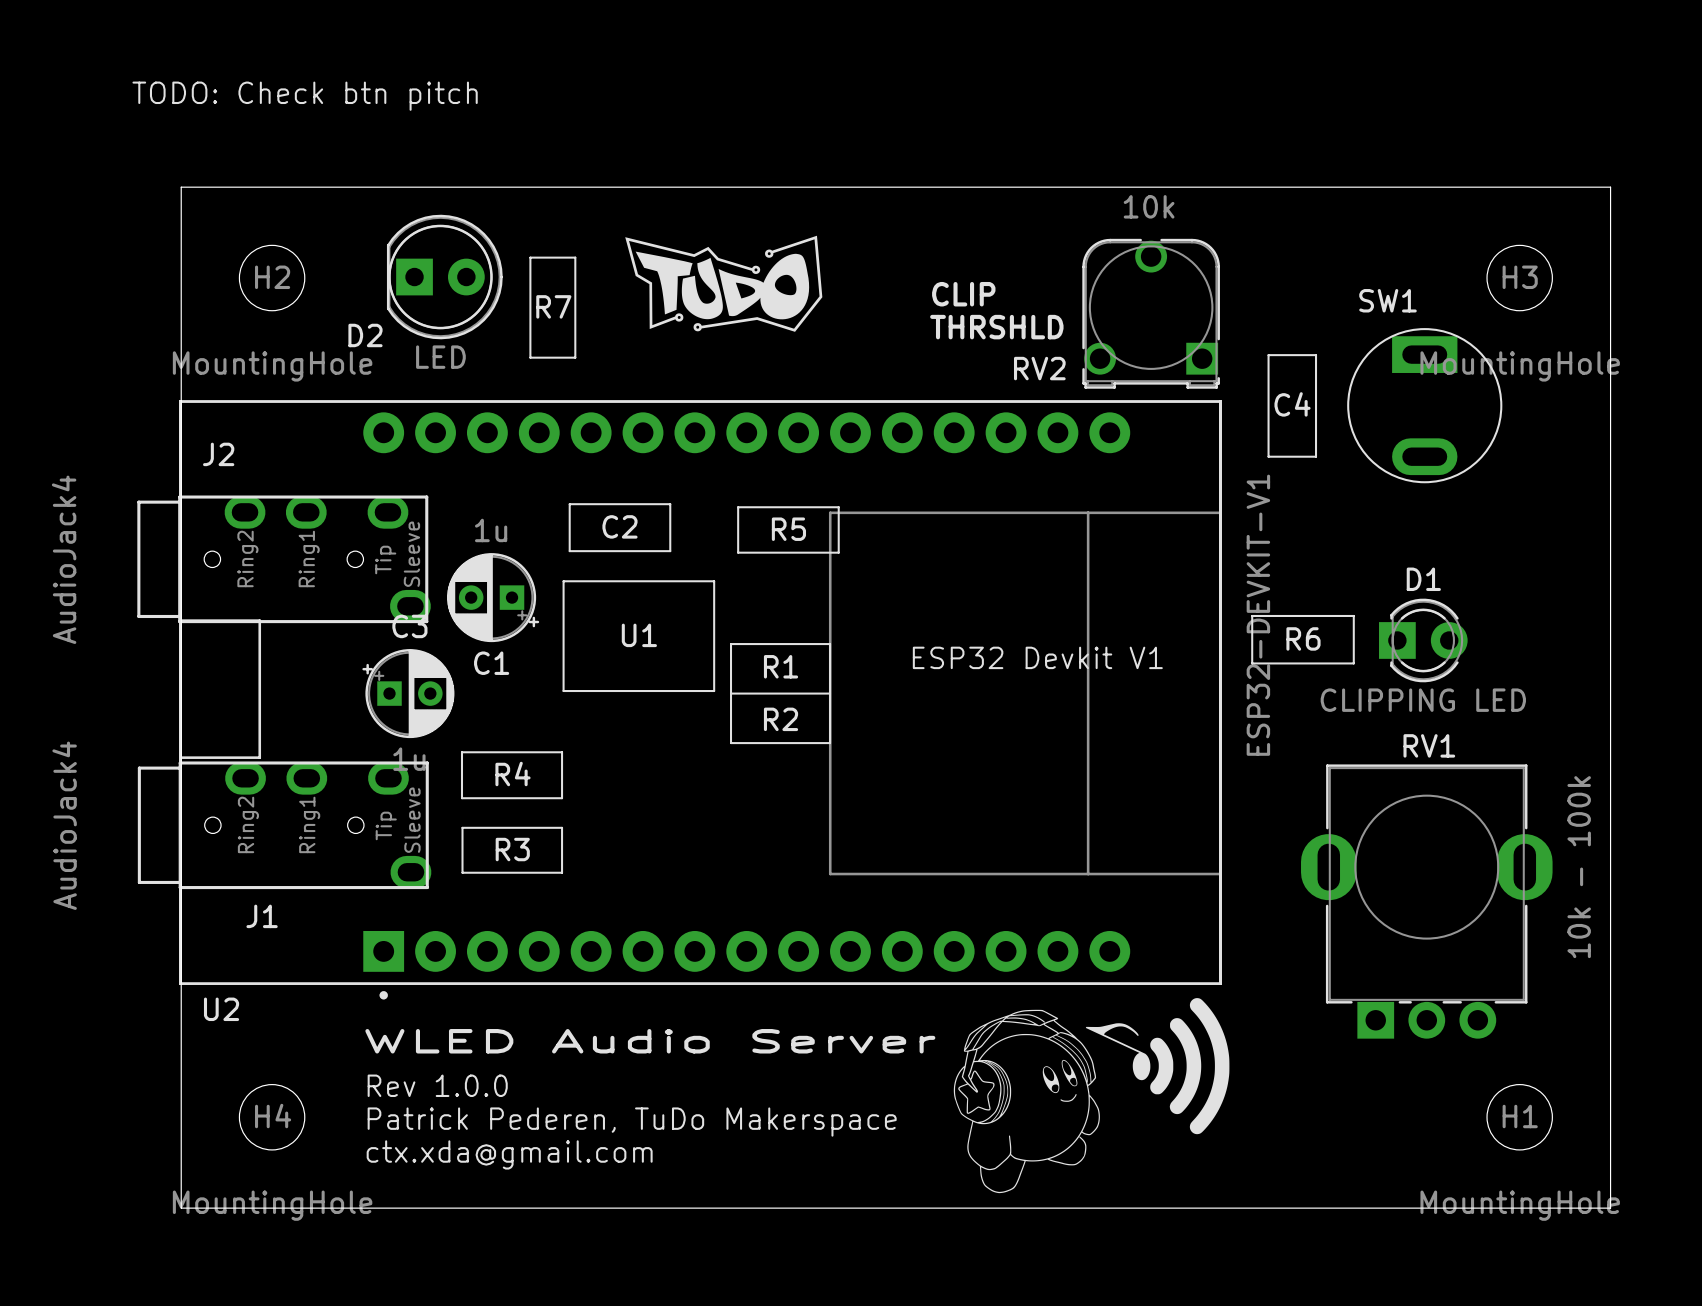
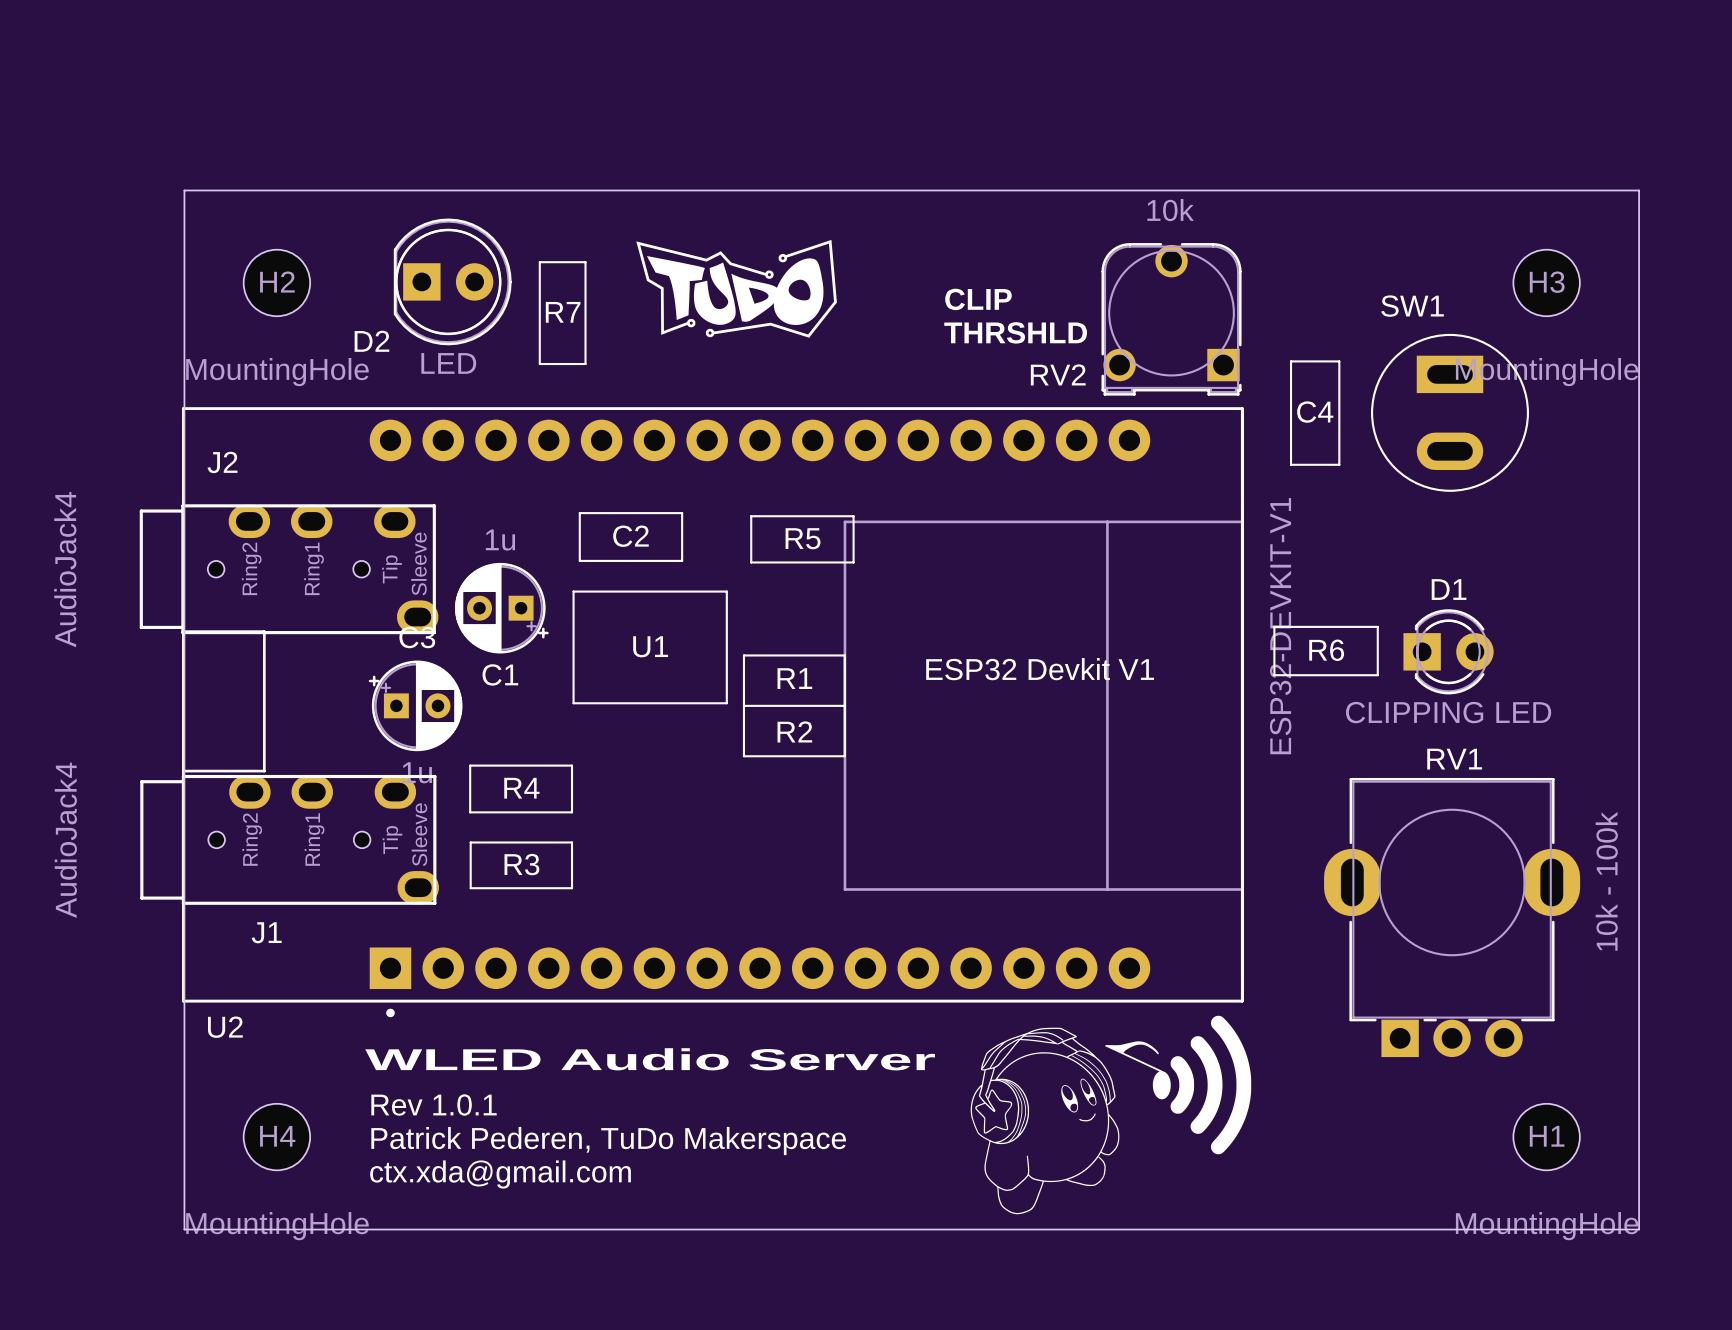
text: TODO: Check btn pitch (305, 96) -> none
SW1 footprint: [1347, 328, 1503, 484] -> [1371, 333, 1529, 492]
text: Rev 1.0.0 (437, 1085) -> Rev 1.0.1 (434, 1105)

